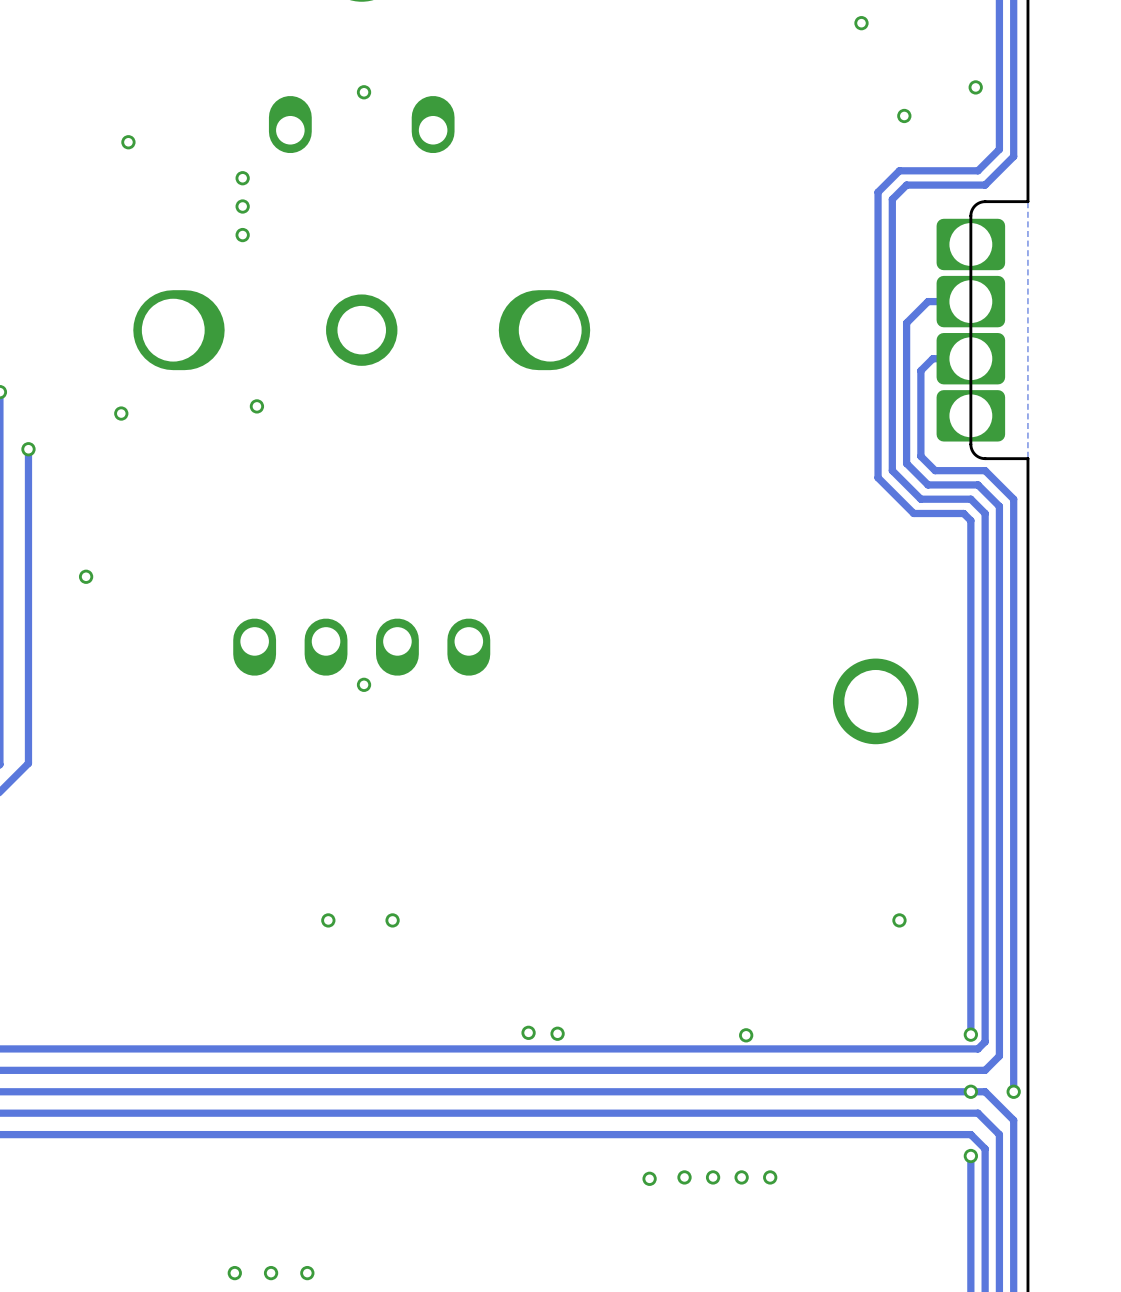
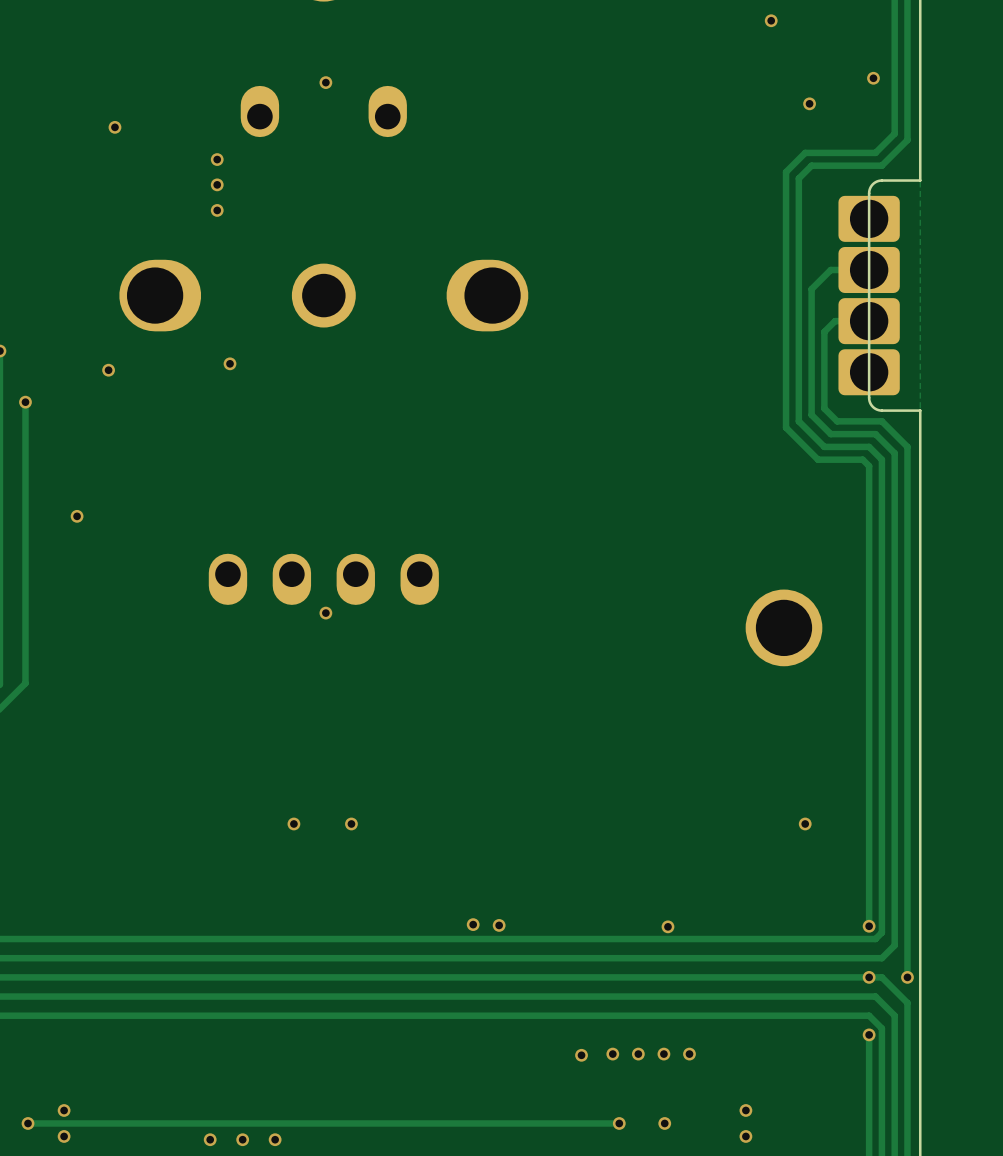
via: none -> (64, 1110)
via: none -> (745, 1110)
via: none -> (28, 1123)
track: none -> (619, 1123) (28, 1123)
via: none -> (619, 1123)
via: none -> (664, 1123)
via: none -> (64, 1136)
via: none -> (745, 1136)

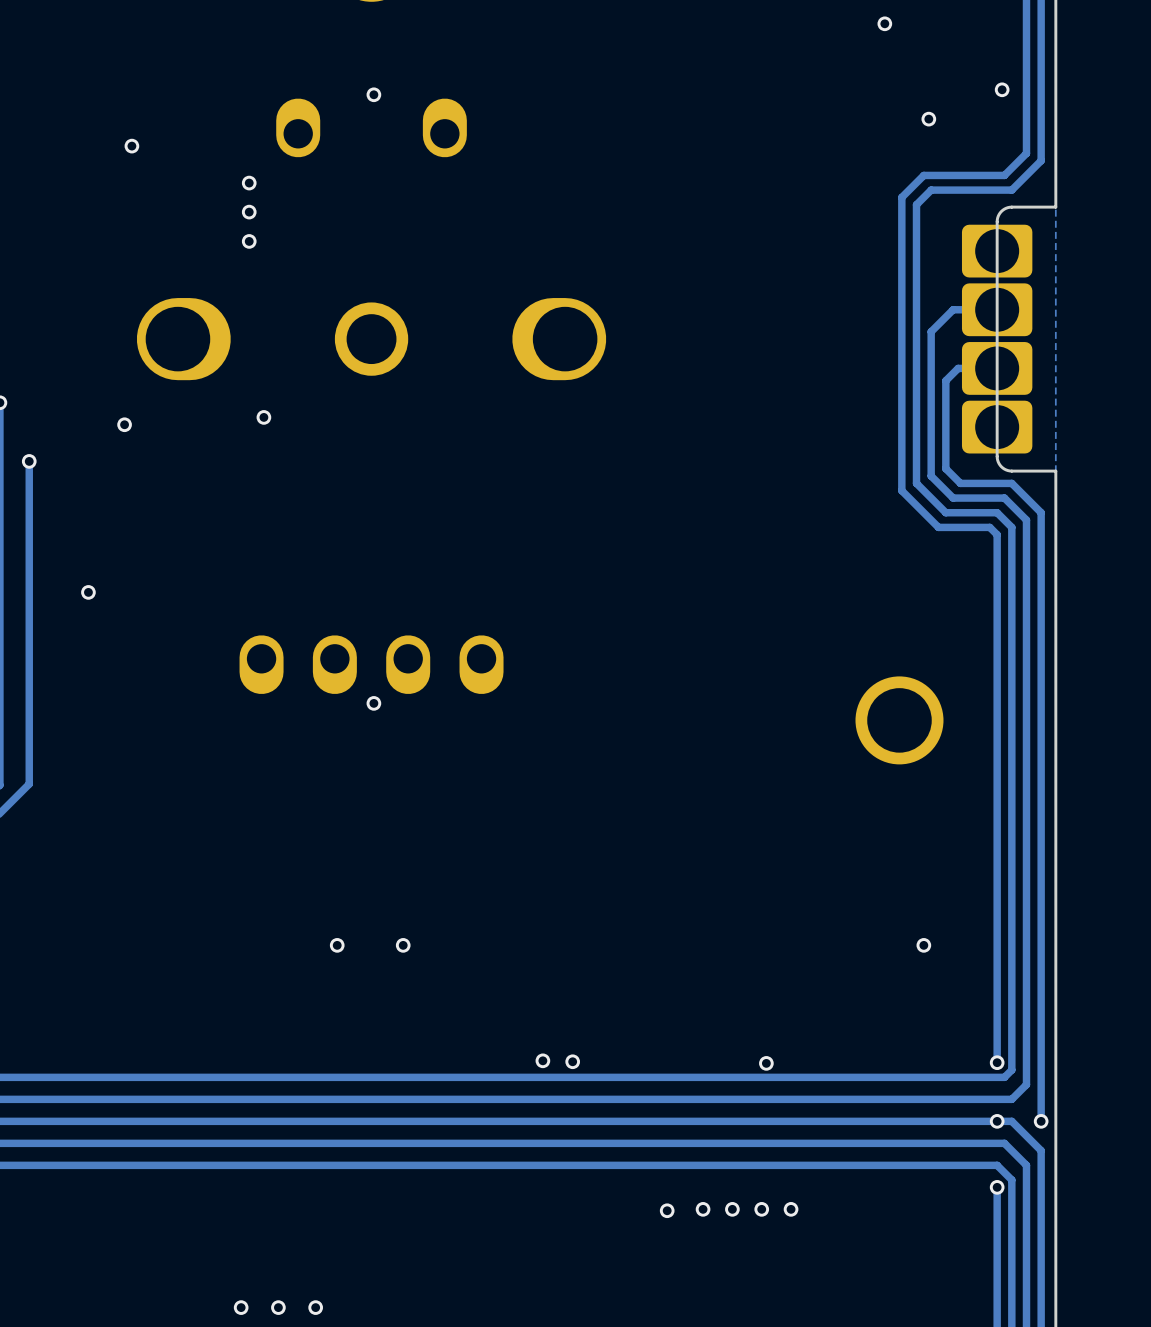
via: (64, 1110) -> none
via: (745, 1110) -> none
via: (28, 1123) -> none
track: (619, 1123) (28, 1123) -> none
via: (619, 1123) -> none
via: (664, 1123) -> none
via: (64, 1136) -> none
via: (745, 1136) -> none

